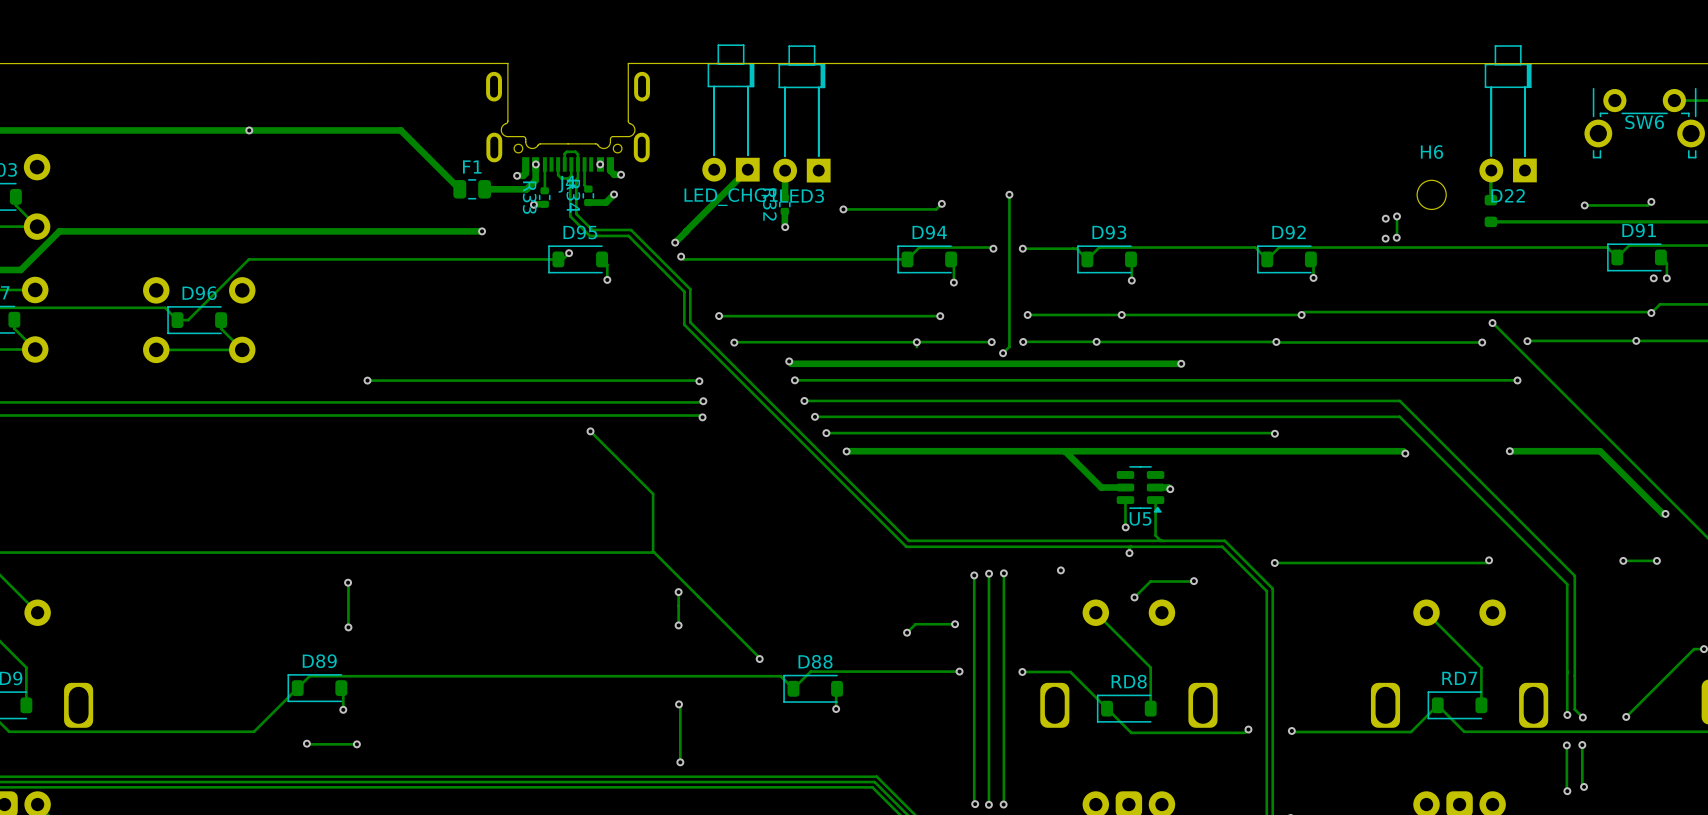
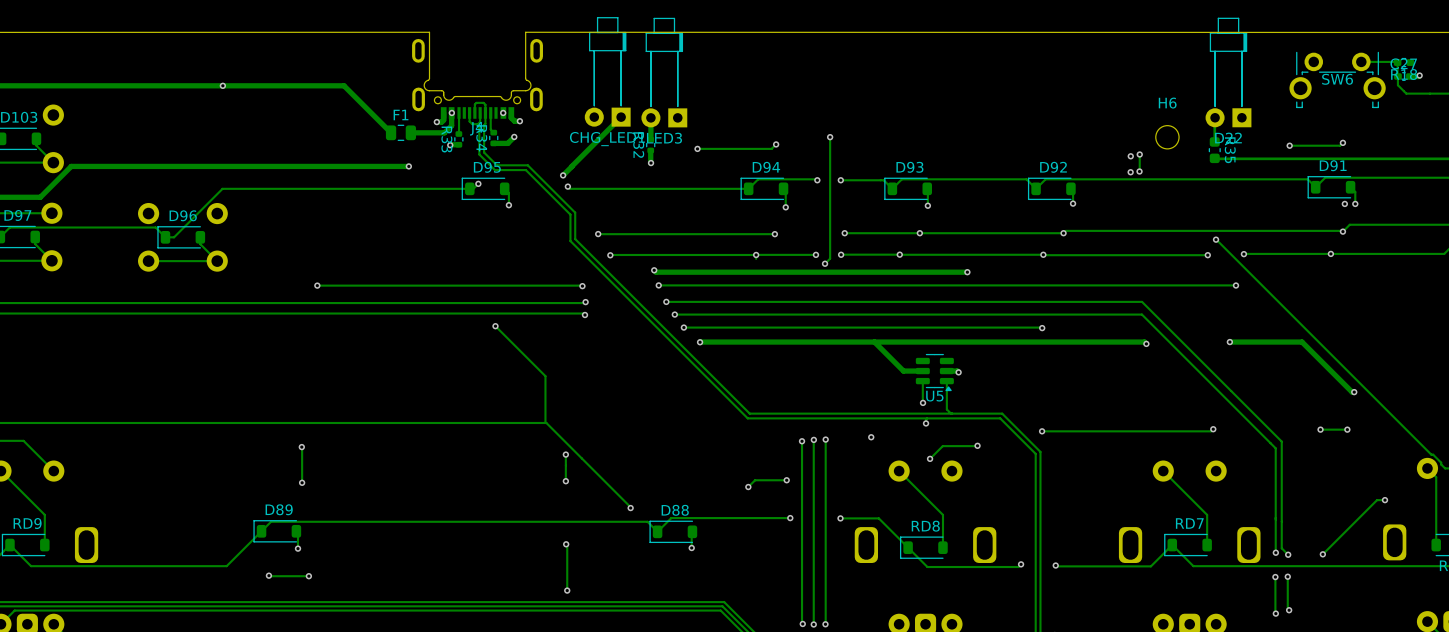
LED_CHG1 name: LED_CHG1 (731, 197) -> CHG_LED1 (607, 139)
part: (1490, 211) -> none
R35: none -> (1214, 150)

